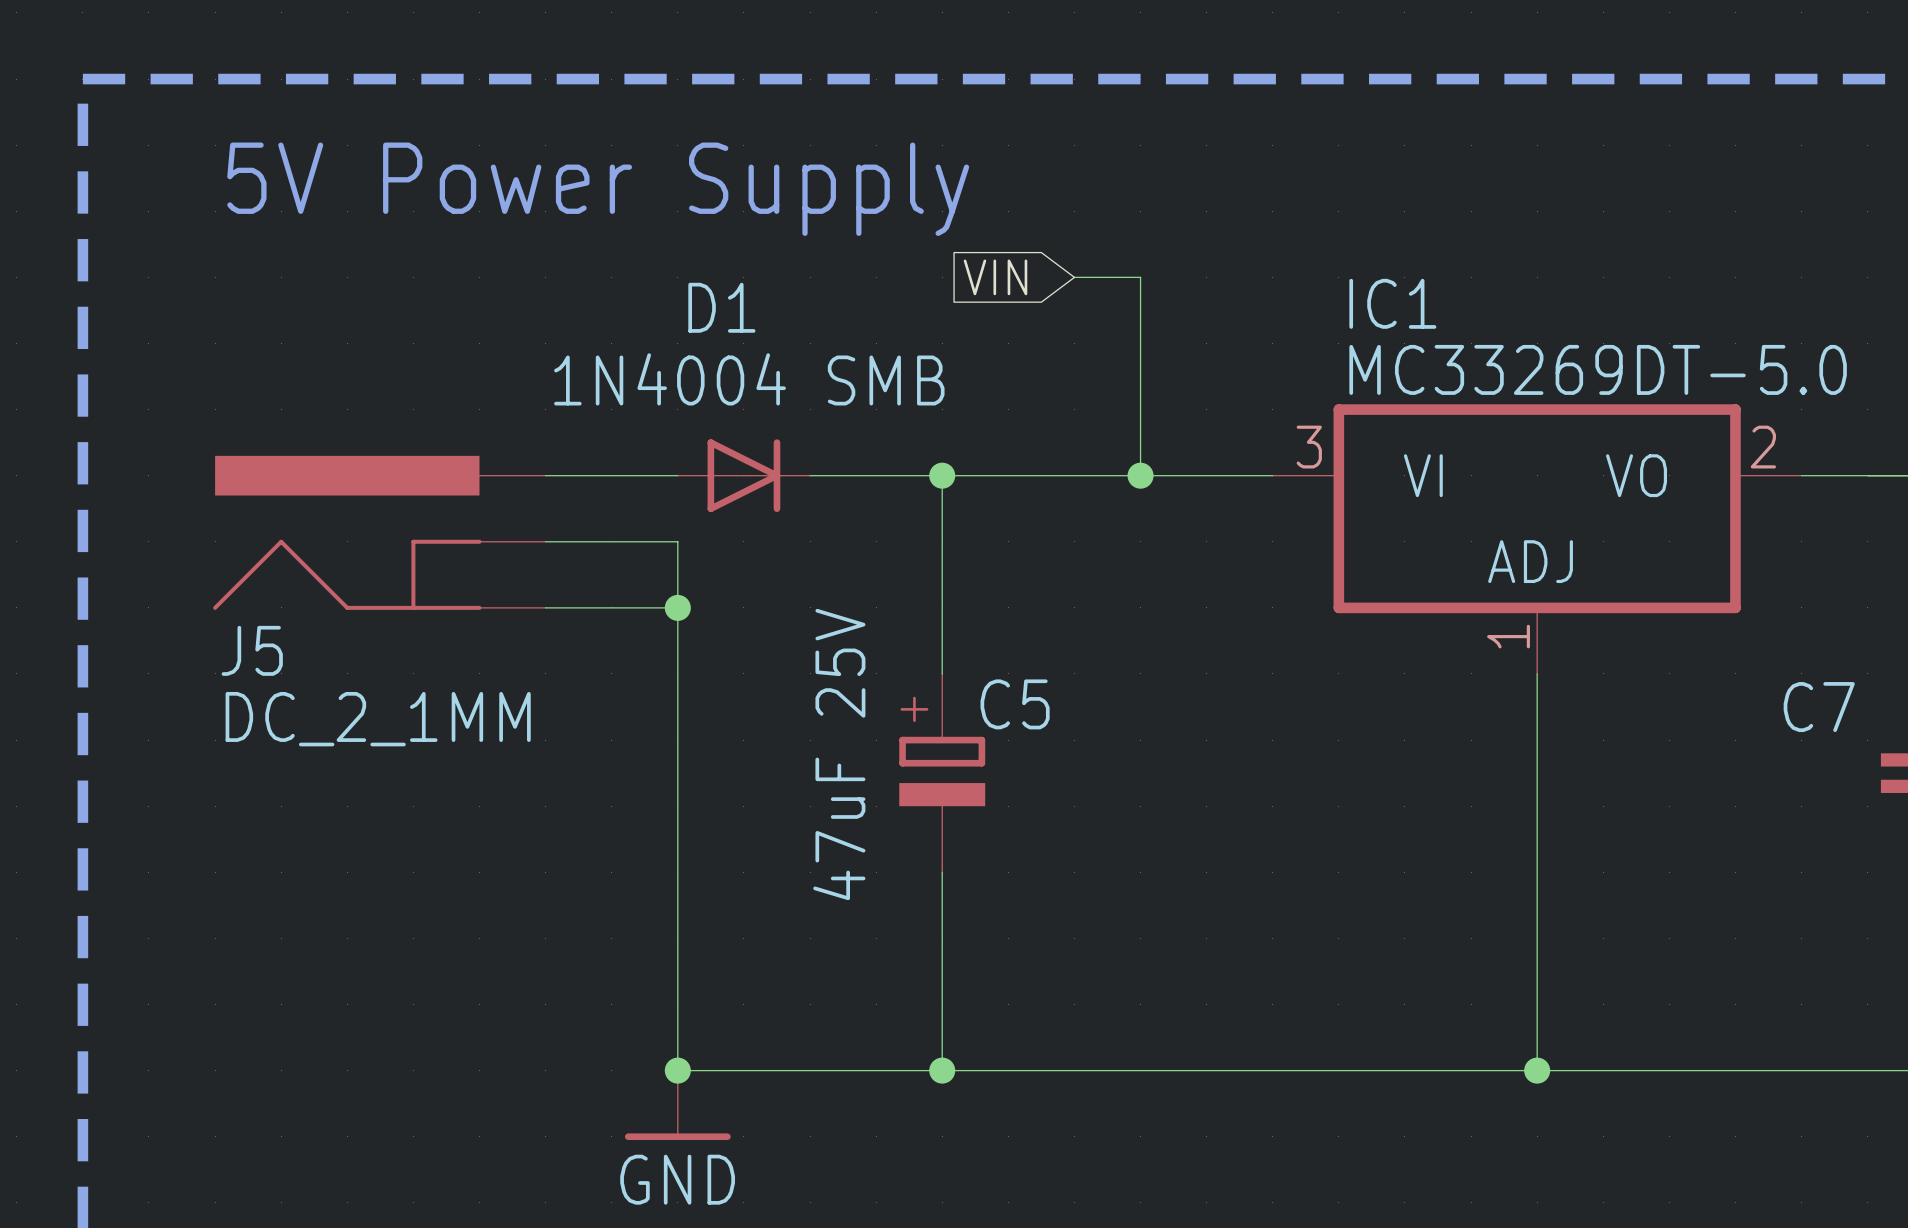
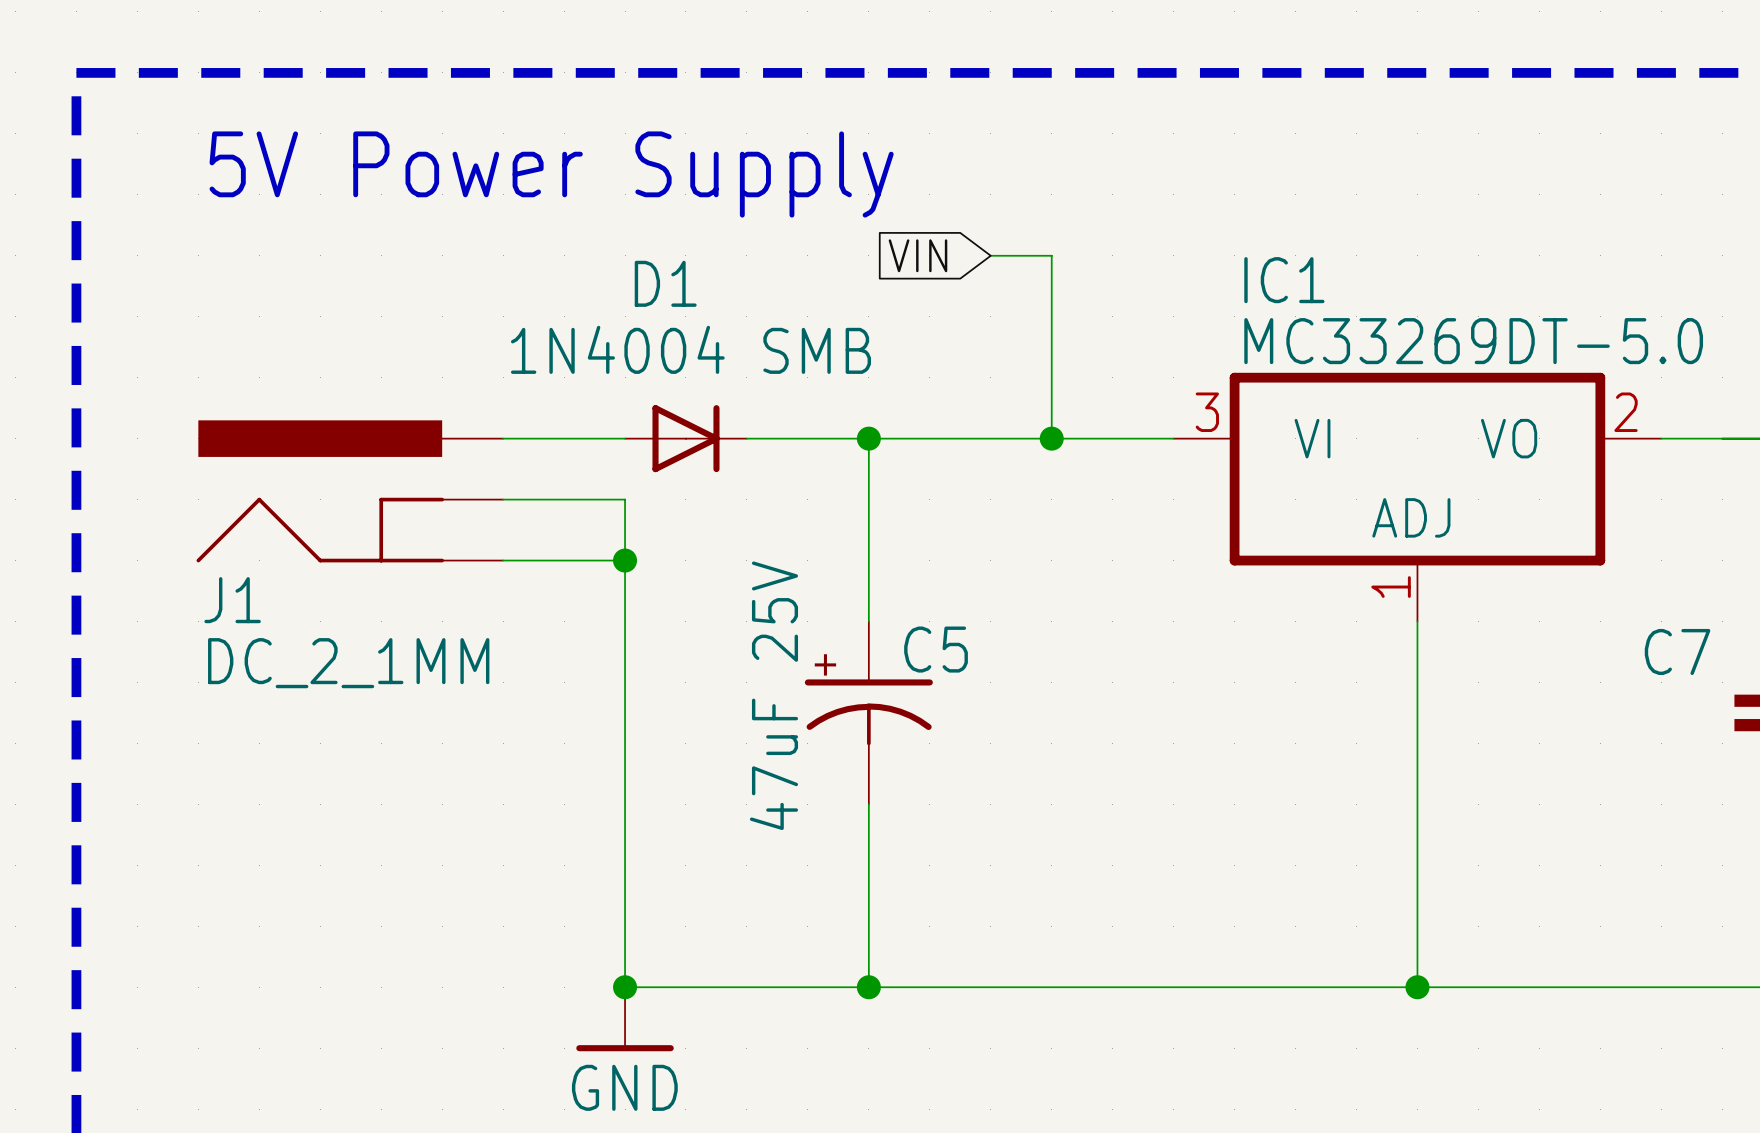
J5 name: J5 (252, 650) -> J1 (232, 600)
C5 symbol: [899, 673, 986, 873] -> [804, 621, 933, 805]

